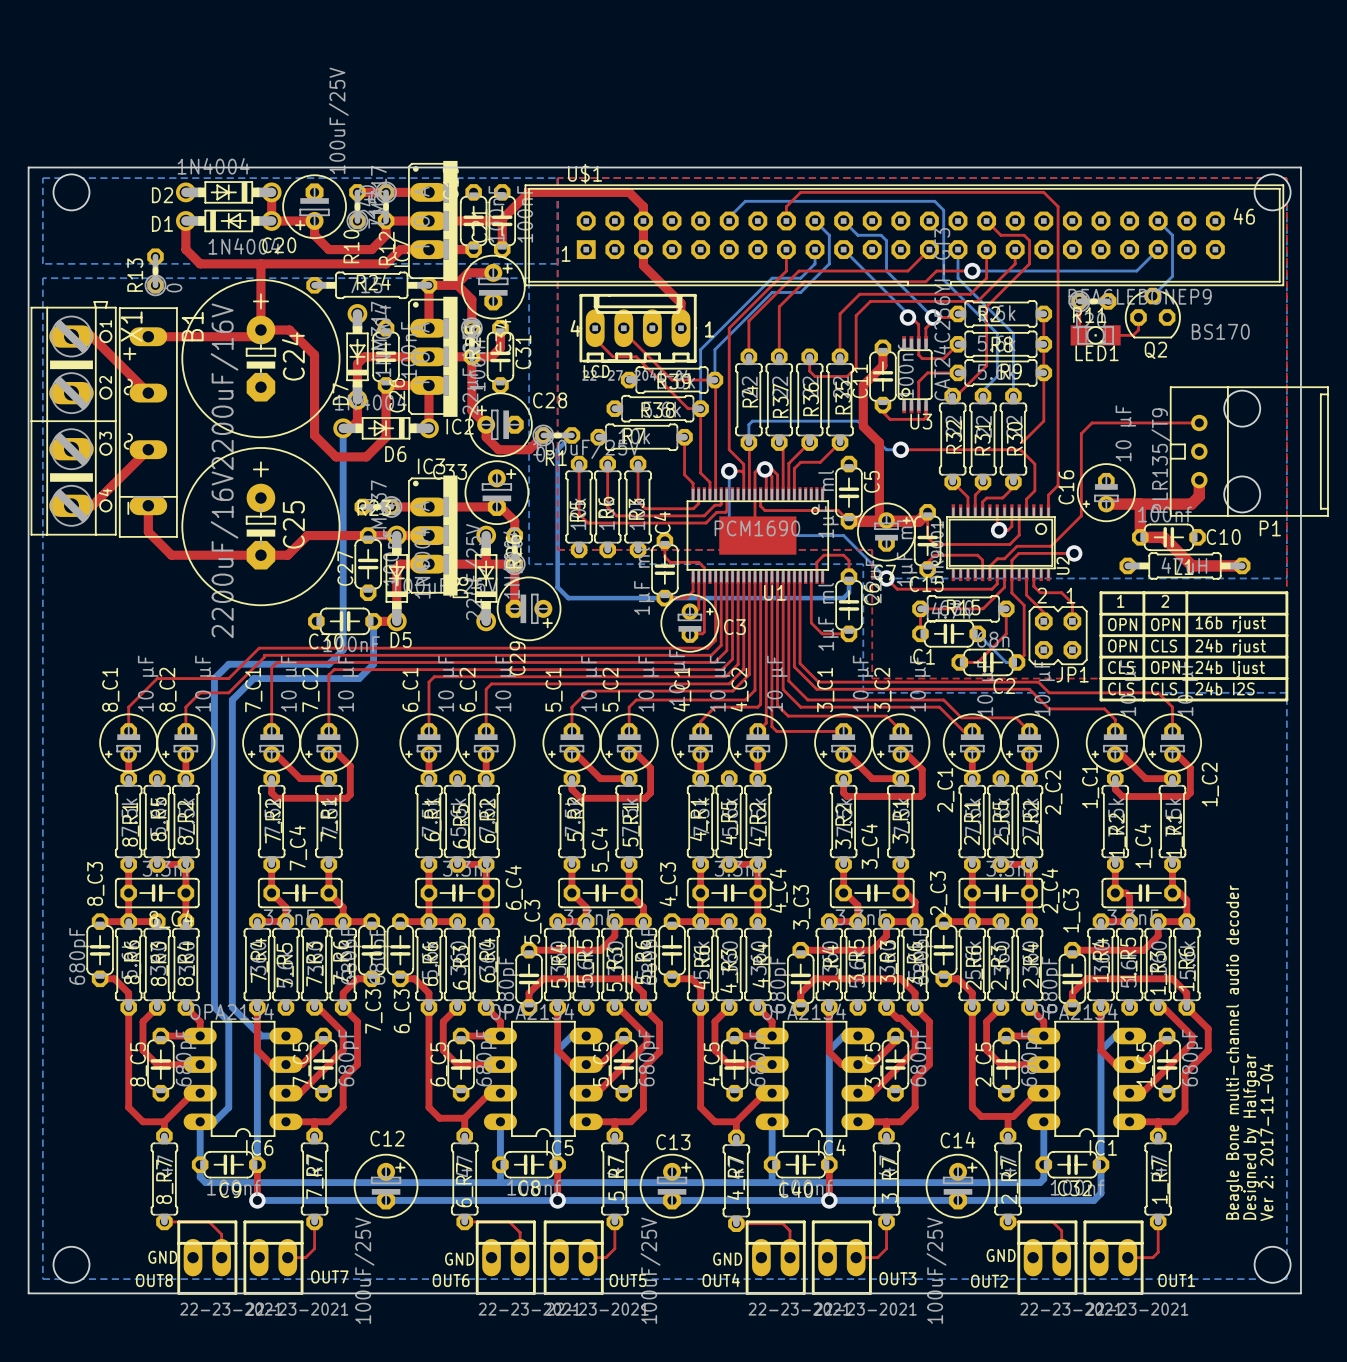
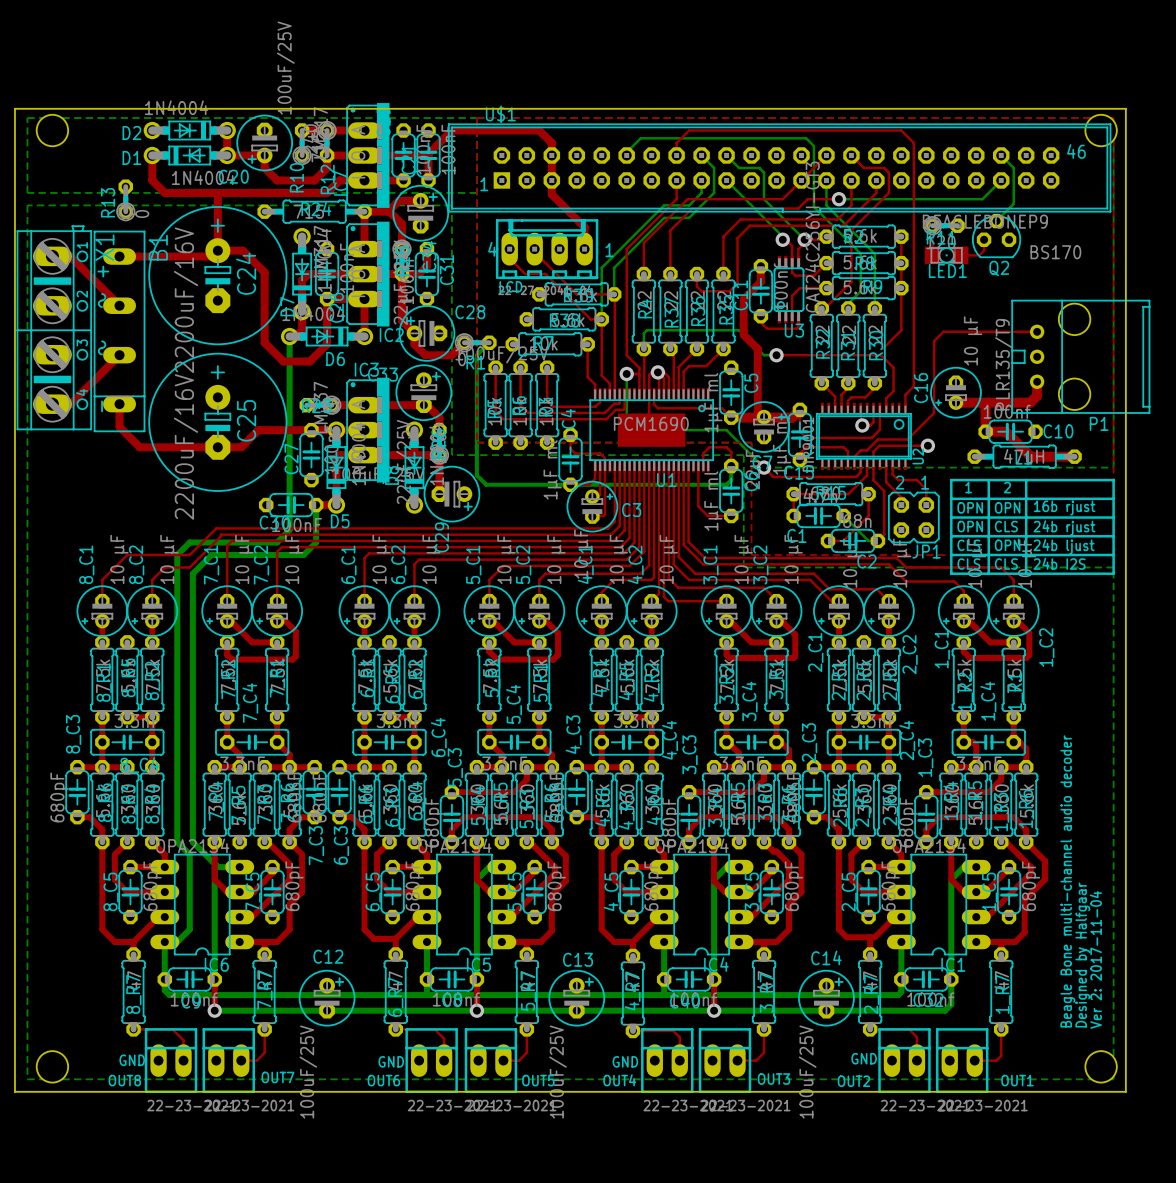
top track: none -> (826, 155) (801, 180)

